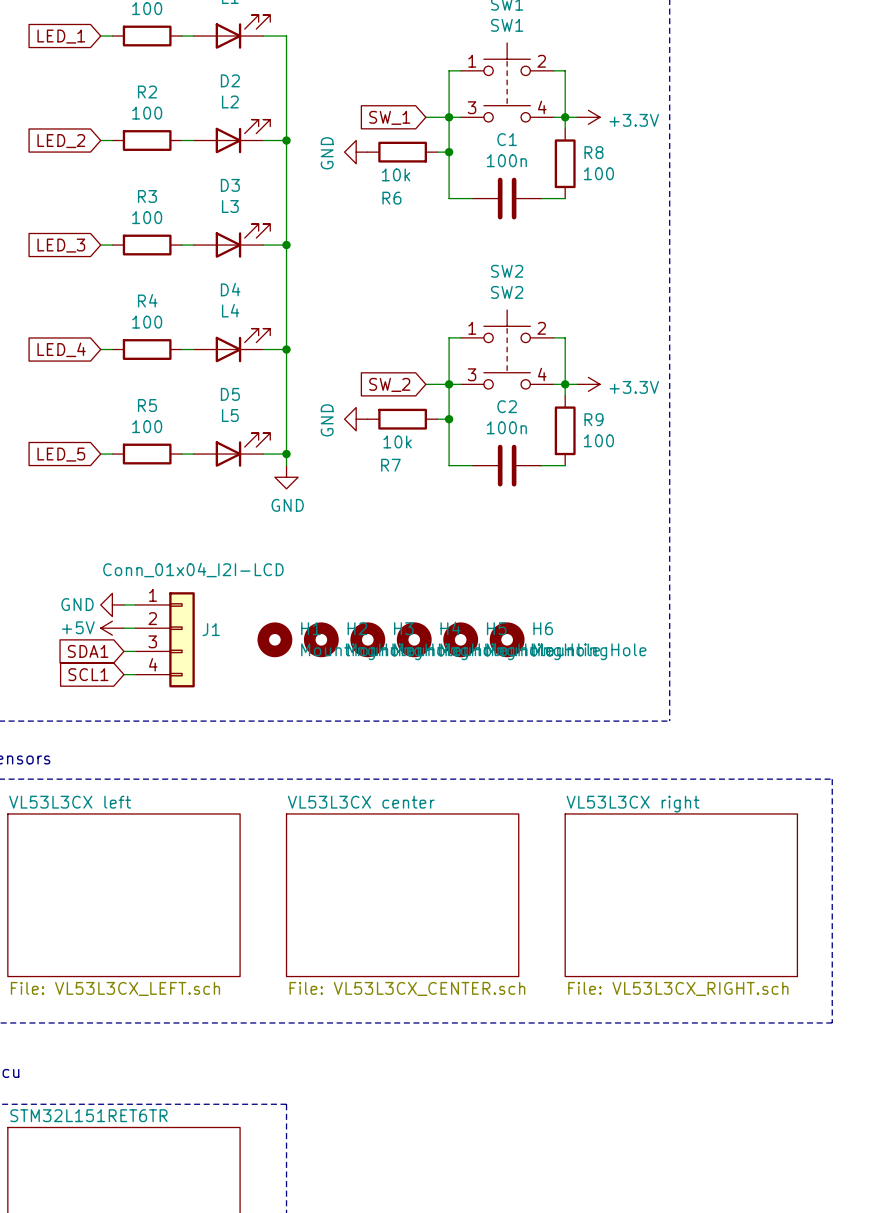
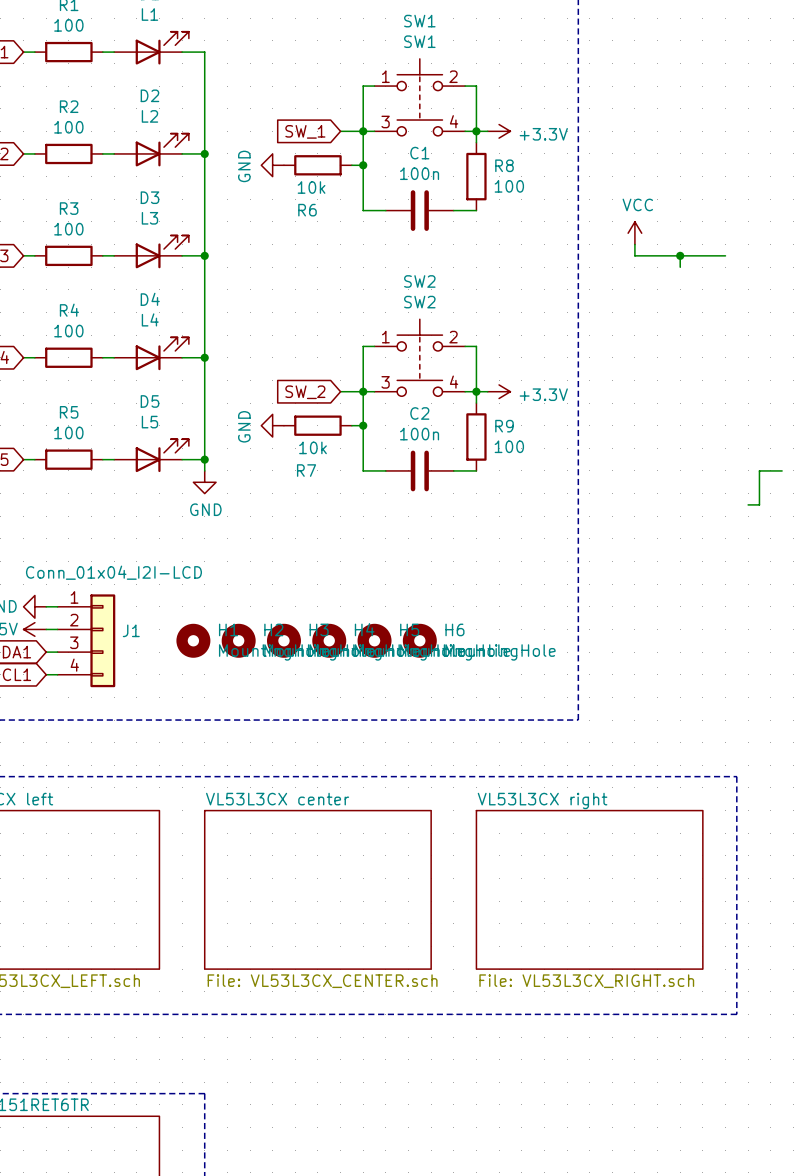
power symbol: none -> VCC (634, 233)
wire: none -> (634, 244) (634, 255) (725, 255)
wire: none -> (680, 255) (680, 267)
junction: none -> (680, 255)
wire: none -> (782, 470) (759, 470) (759, 504) (748, 504)

